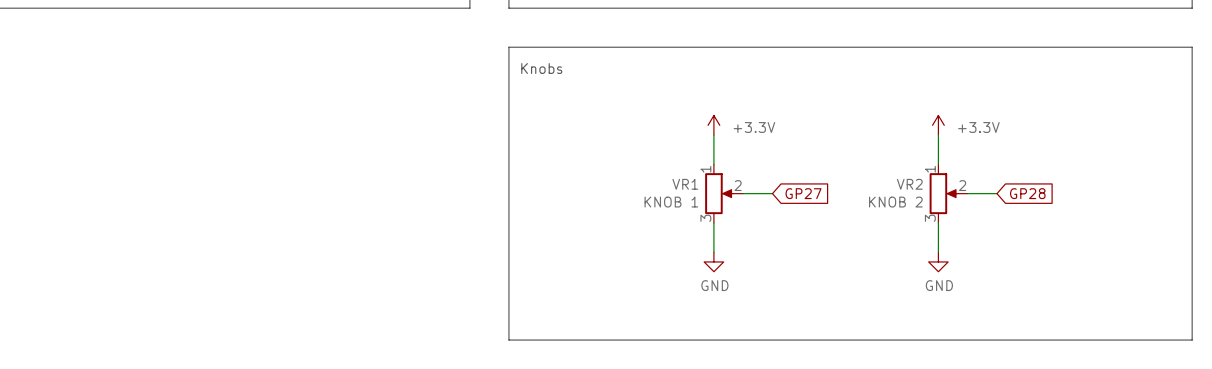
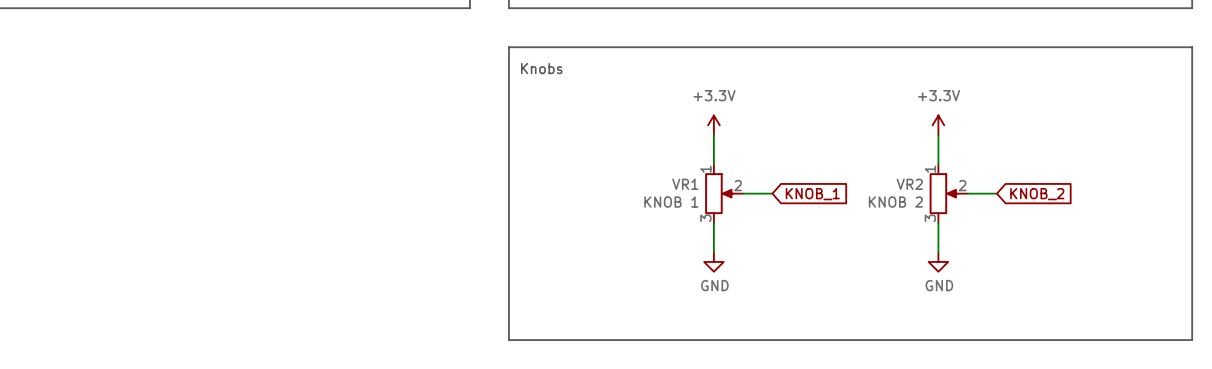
power symbol: none -> +3.3V (713, 125)
part: +3.3V (713, 125) -> none
power symbol: none -> +3.3V (938, 125)
part: +3.3V (938, 125) -> none
global label: GP27 (803, 193) -> KNOB_1 (812, 194)
global label: GP28 (1027, 193) -> KNOB_2 (1037, 194)

